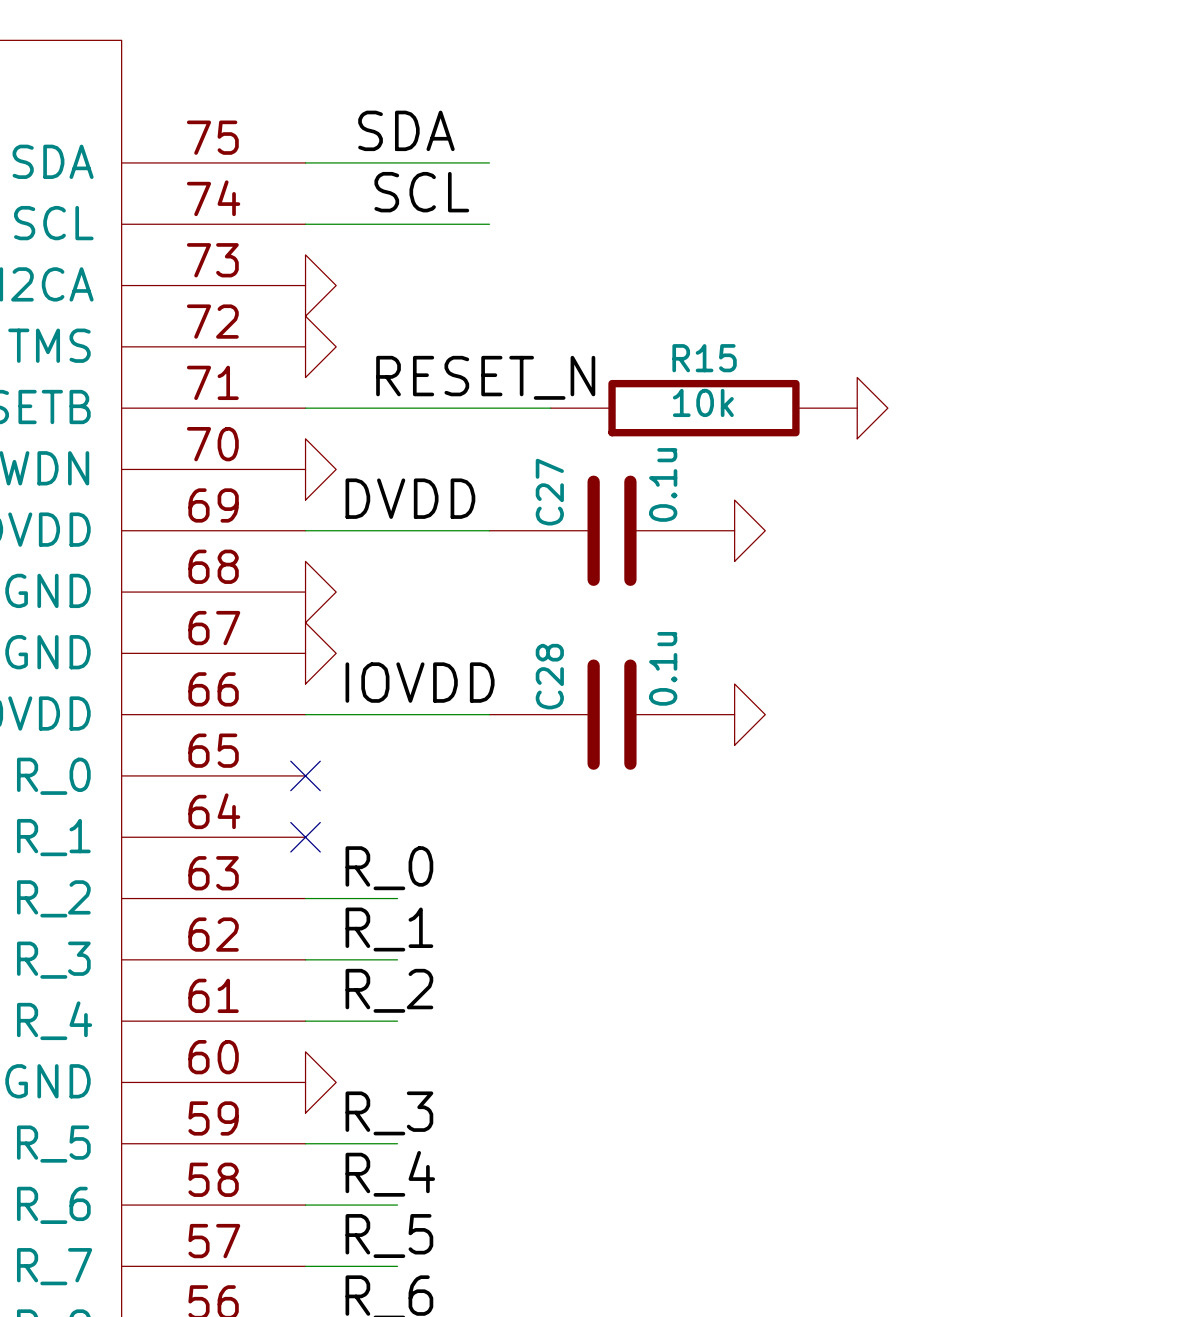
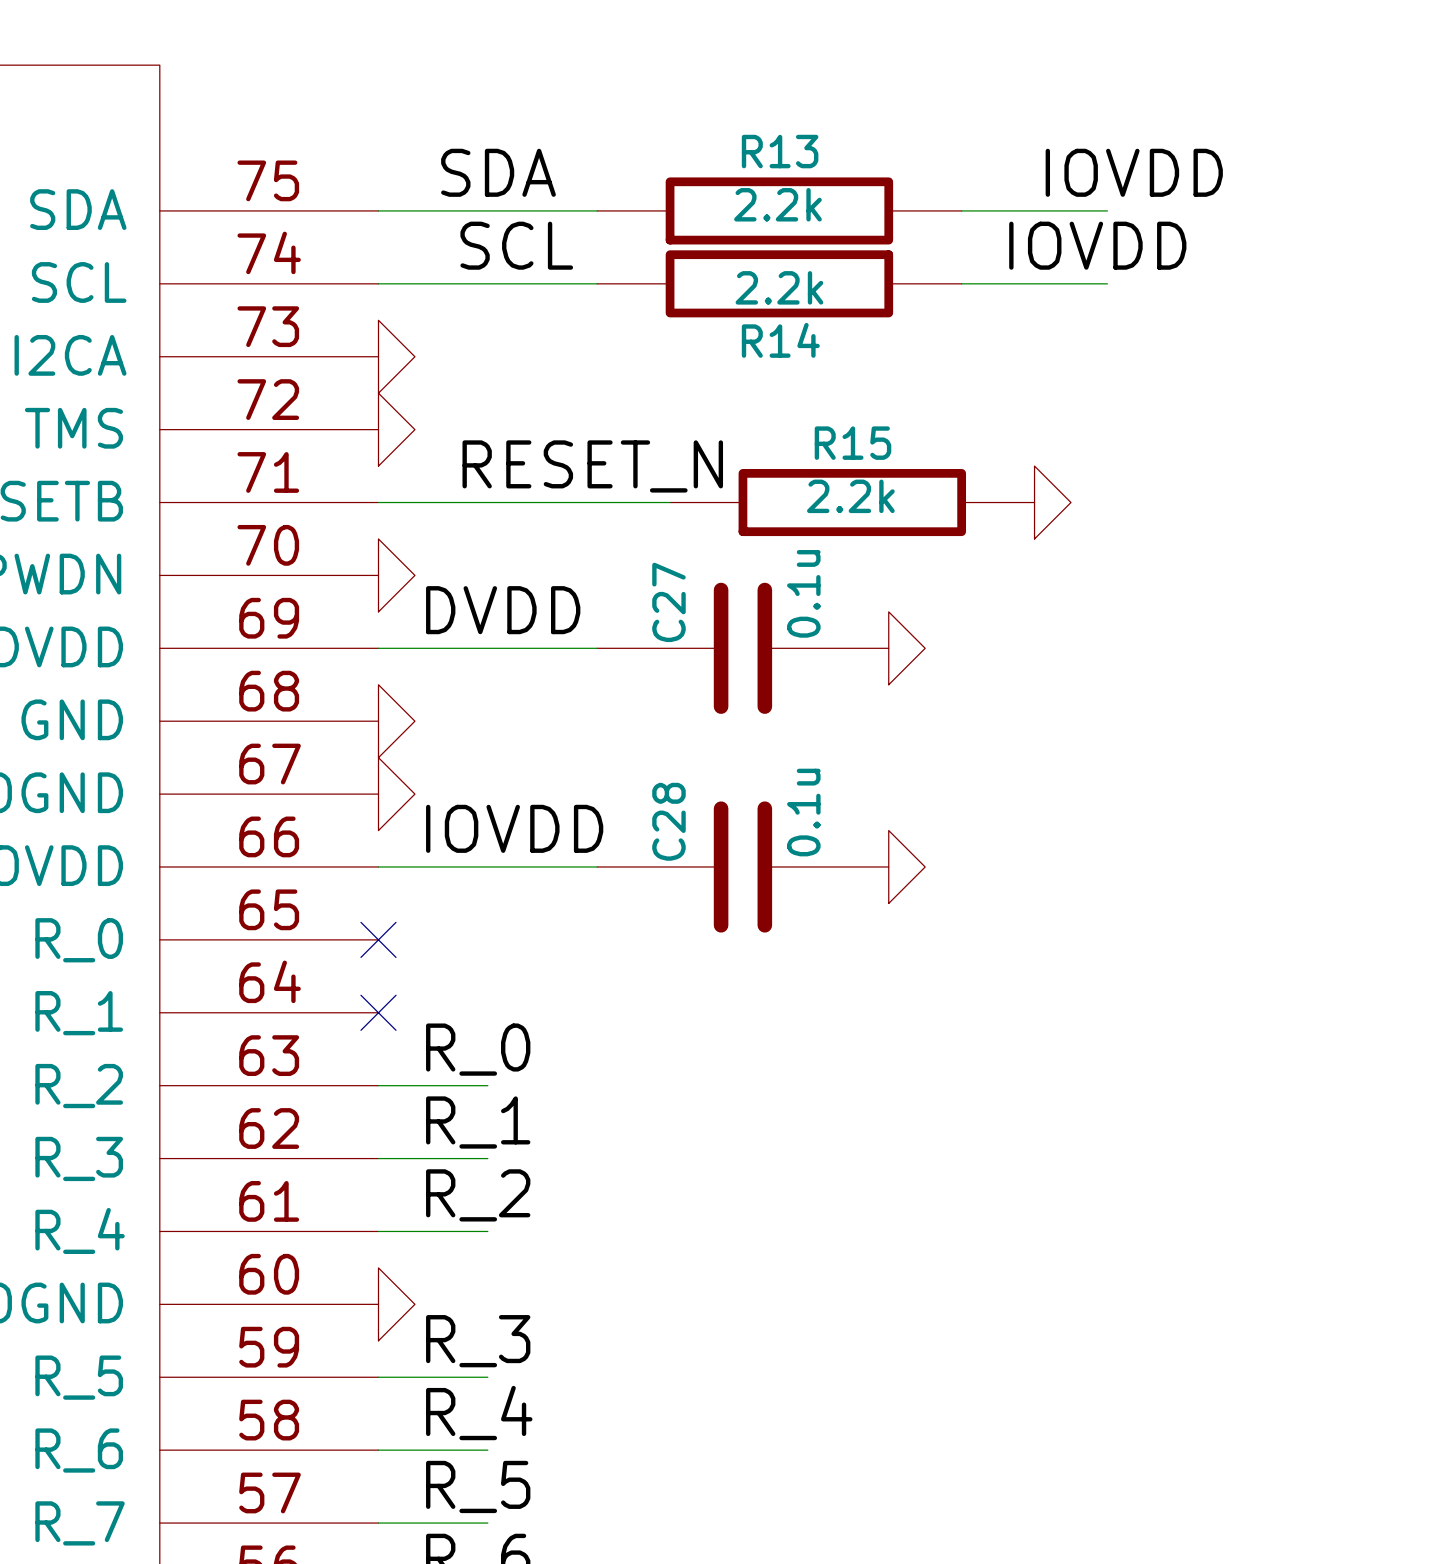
label: none -> IOVDD (1134, 172)
R13: none -> 2.2k (779, 210)
wire: none -> (961, 210) (1107, 210)
label: none -> IOVDD (1097, 245)
R14: none -> 2.2k (779, 283)
wire: none -> (961, 283) (1107, 283)
R15 value: 10k (703, 402) -> 2.2k (850, 496)

